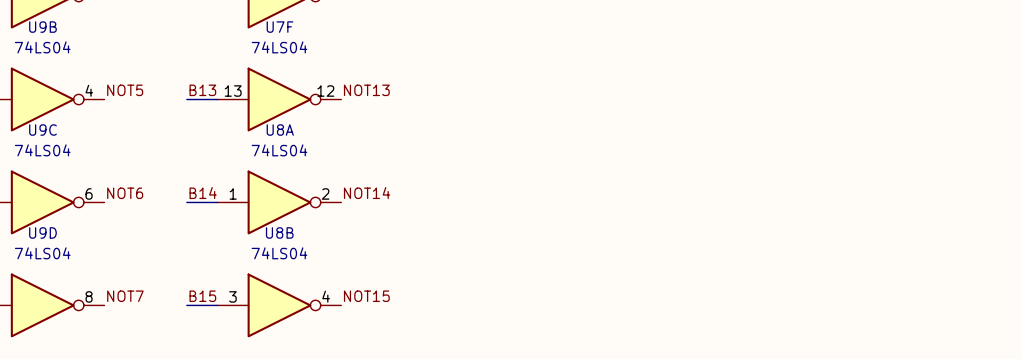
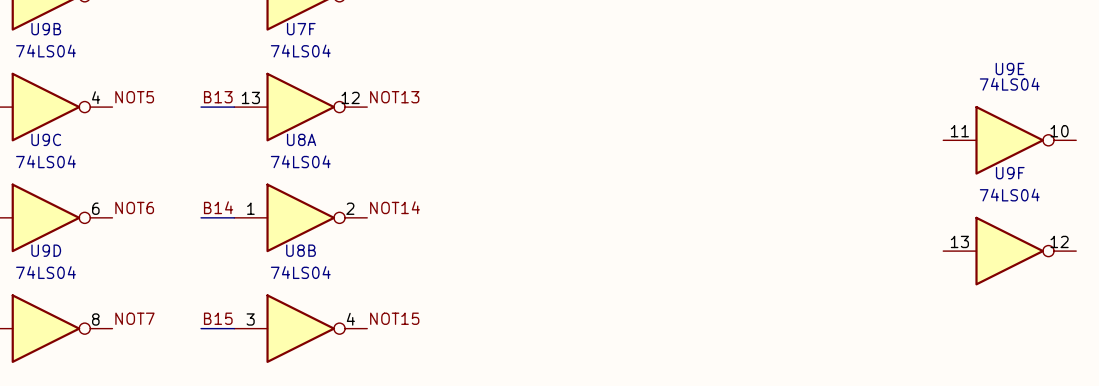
U9E: none -> 74LS04 (1009, 140)
U9F: none -> 74LS04 (1009, 251)

